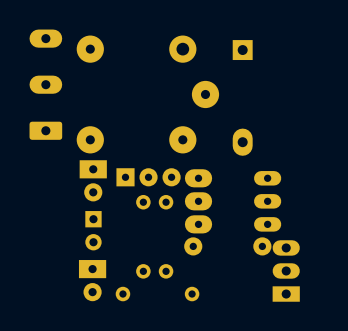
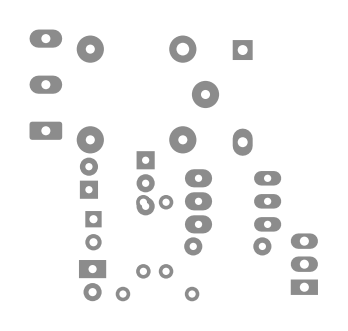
part footprint: [79, 160, 107, 202] -> [79, 157, 99, 199]
part rotation: 0° (148, 177) -> 90° clockwise (145, 183)
part position: (286, 270) -> (304, 264)

